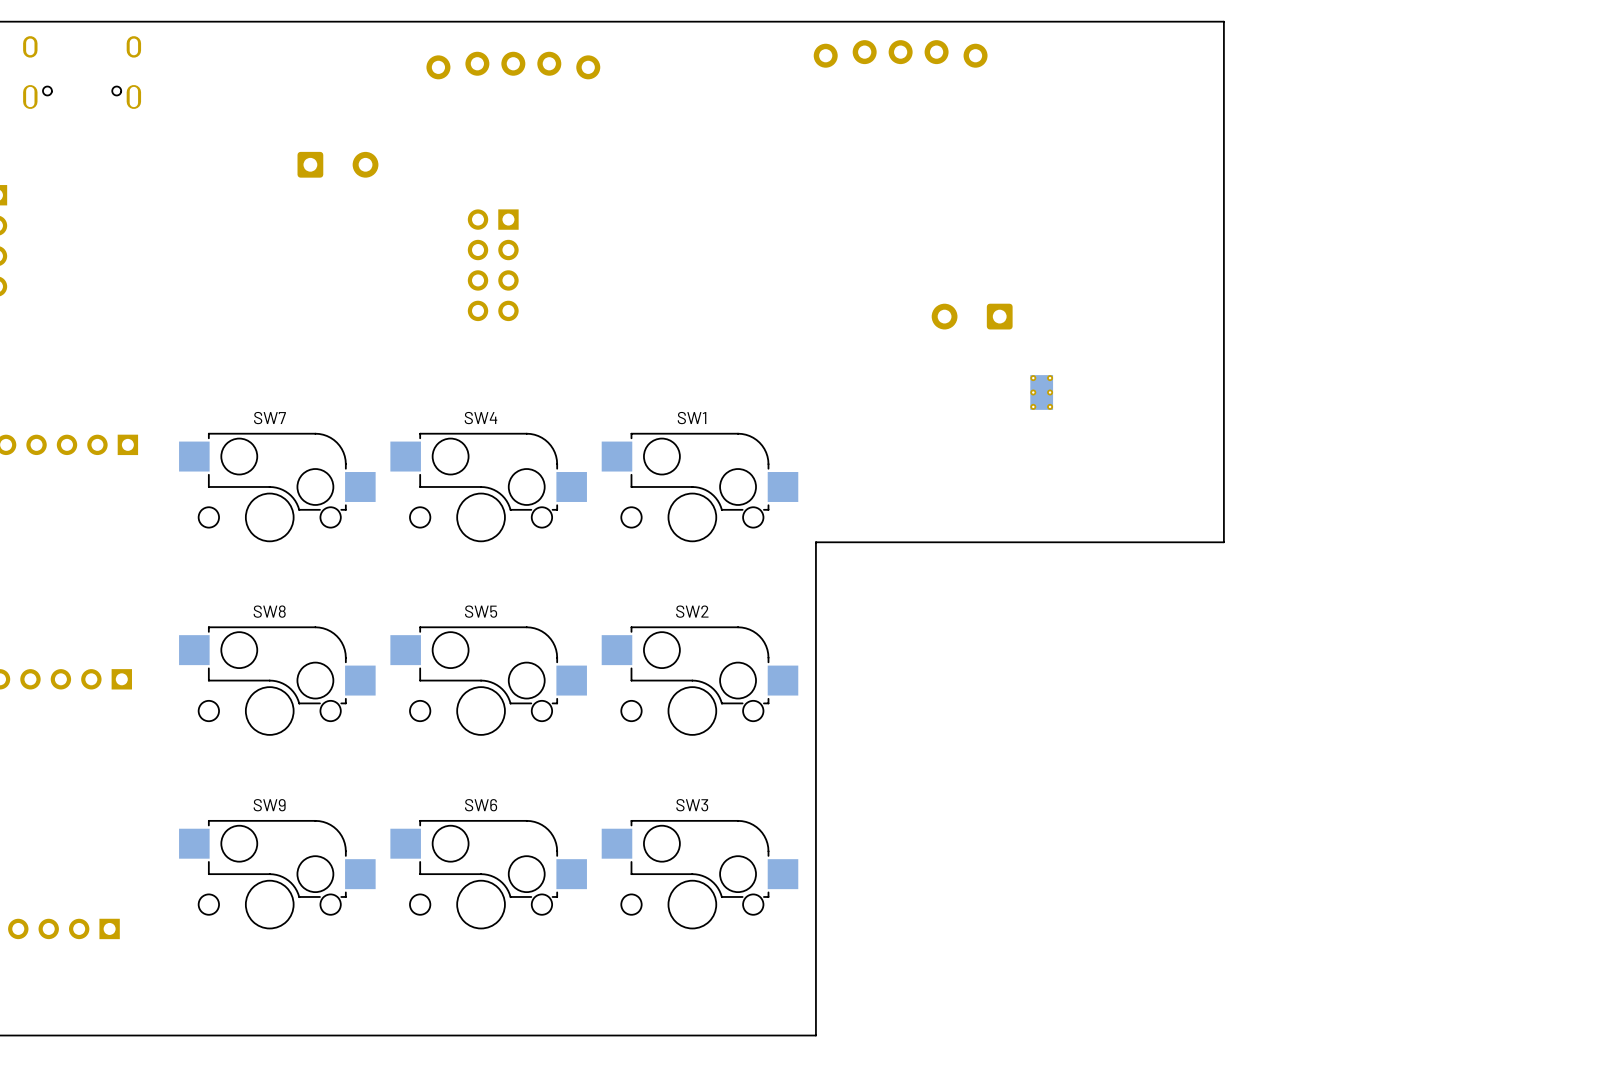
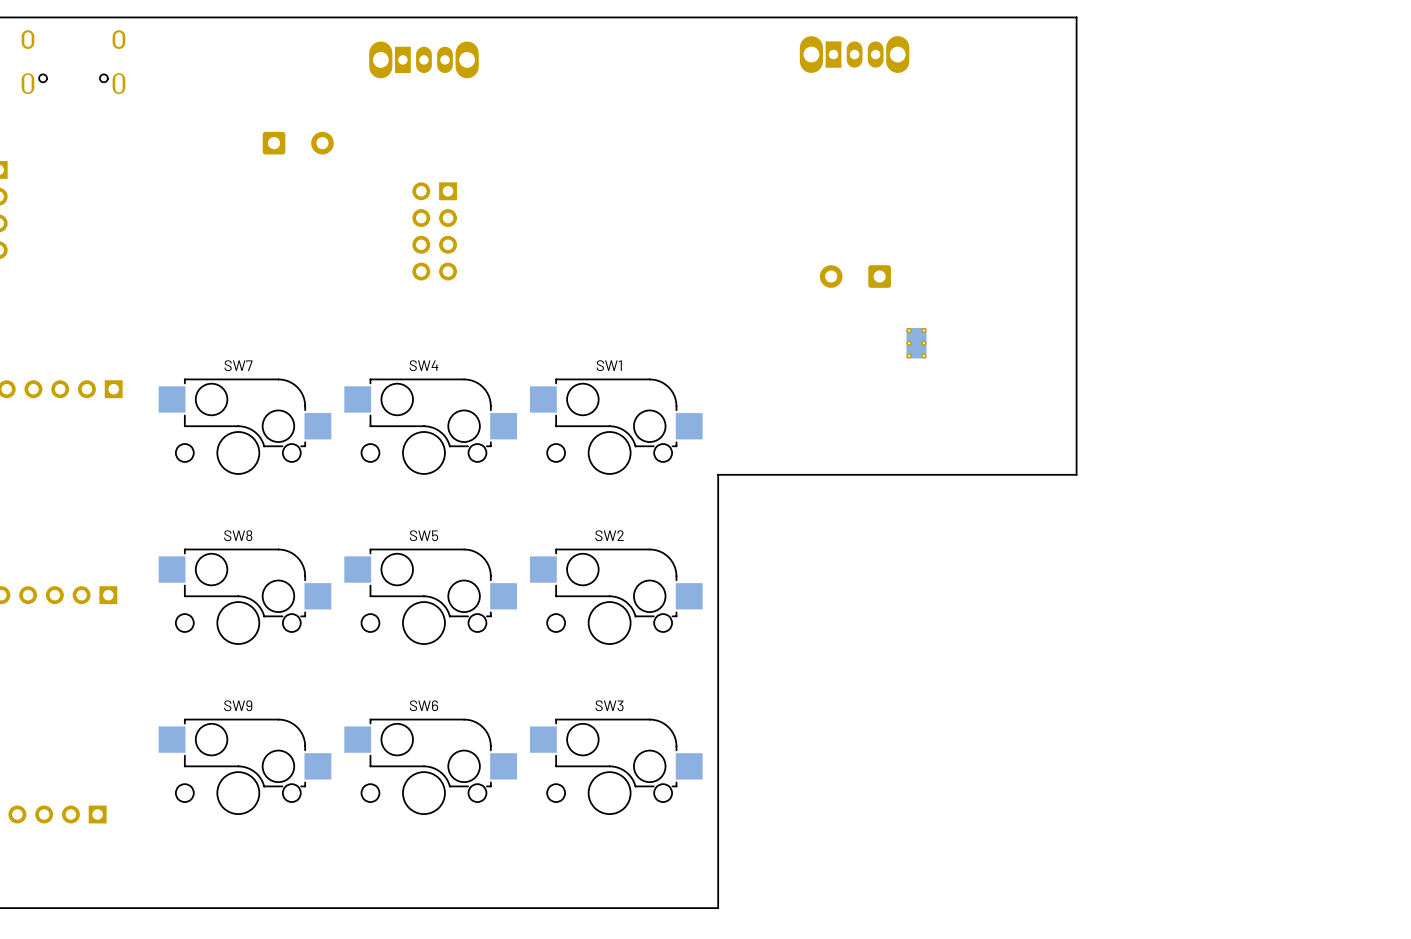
part: (900, 53) -> none
part: none -> (854, 54)
part: (513, 65) -> none
part: none -> (423, 59)

